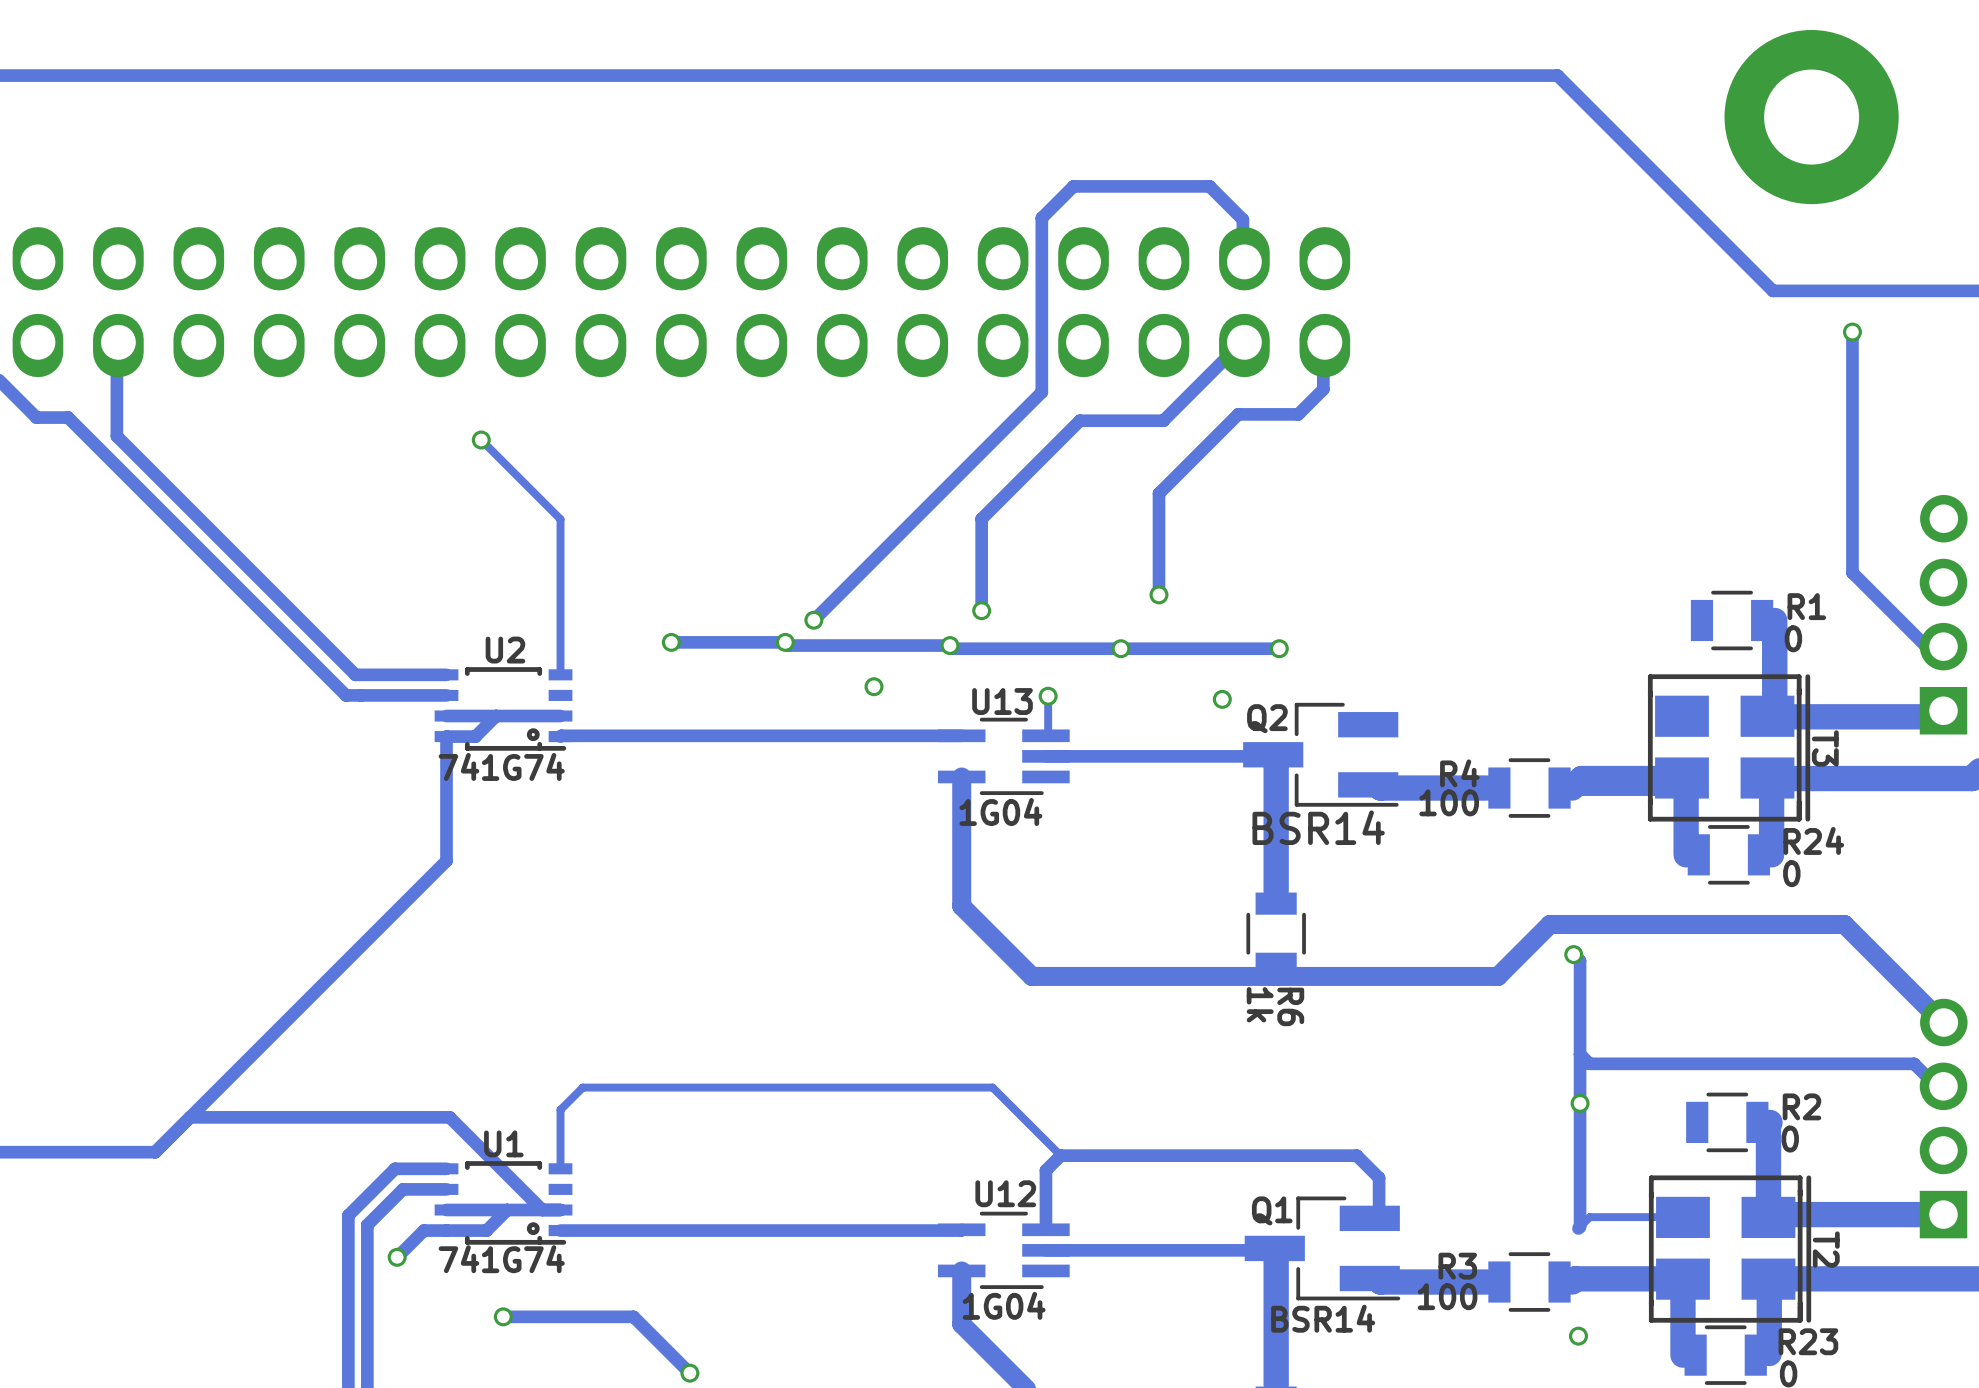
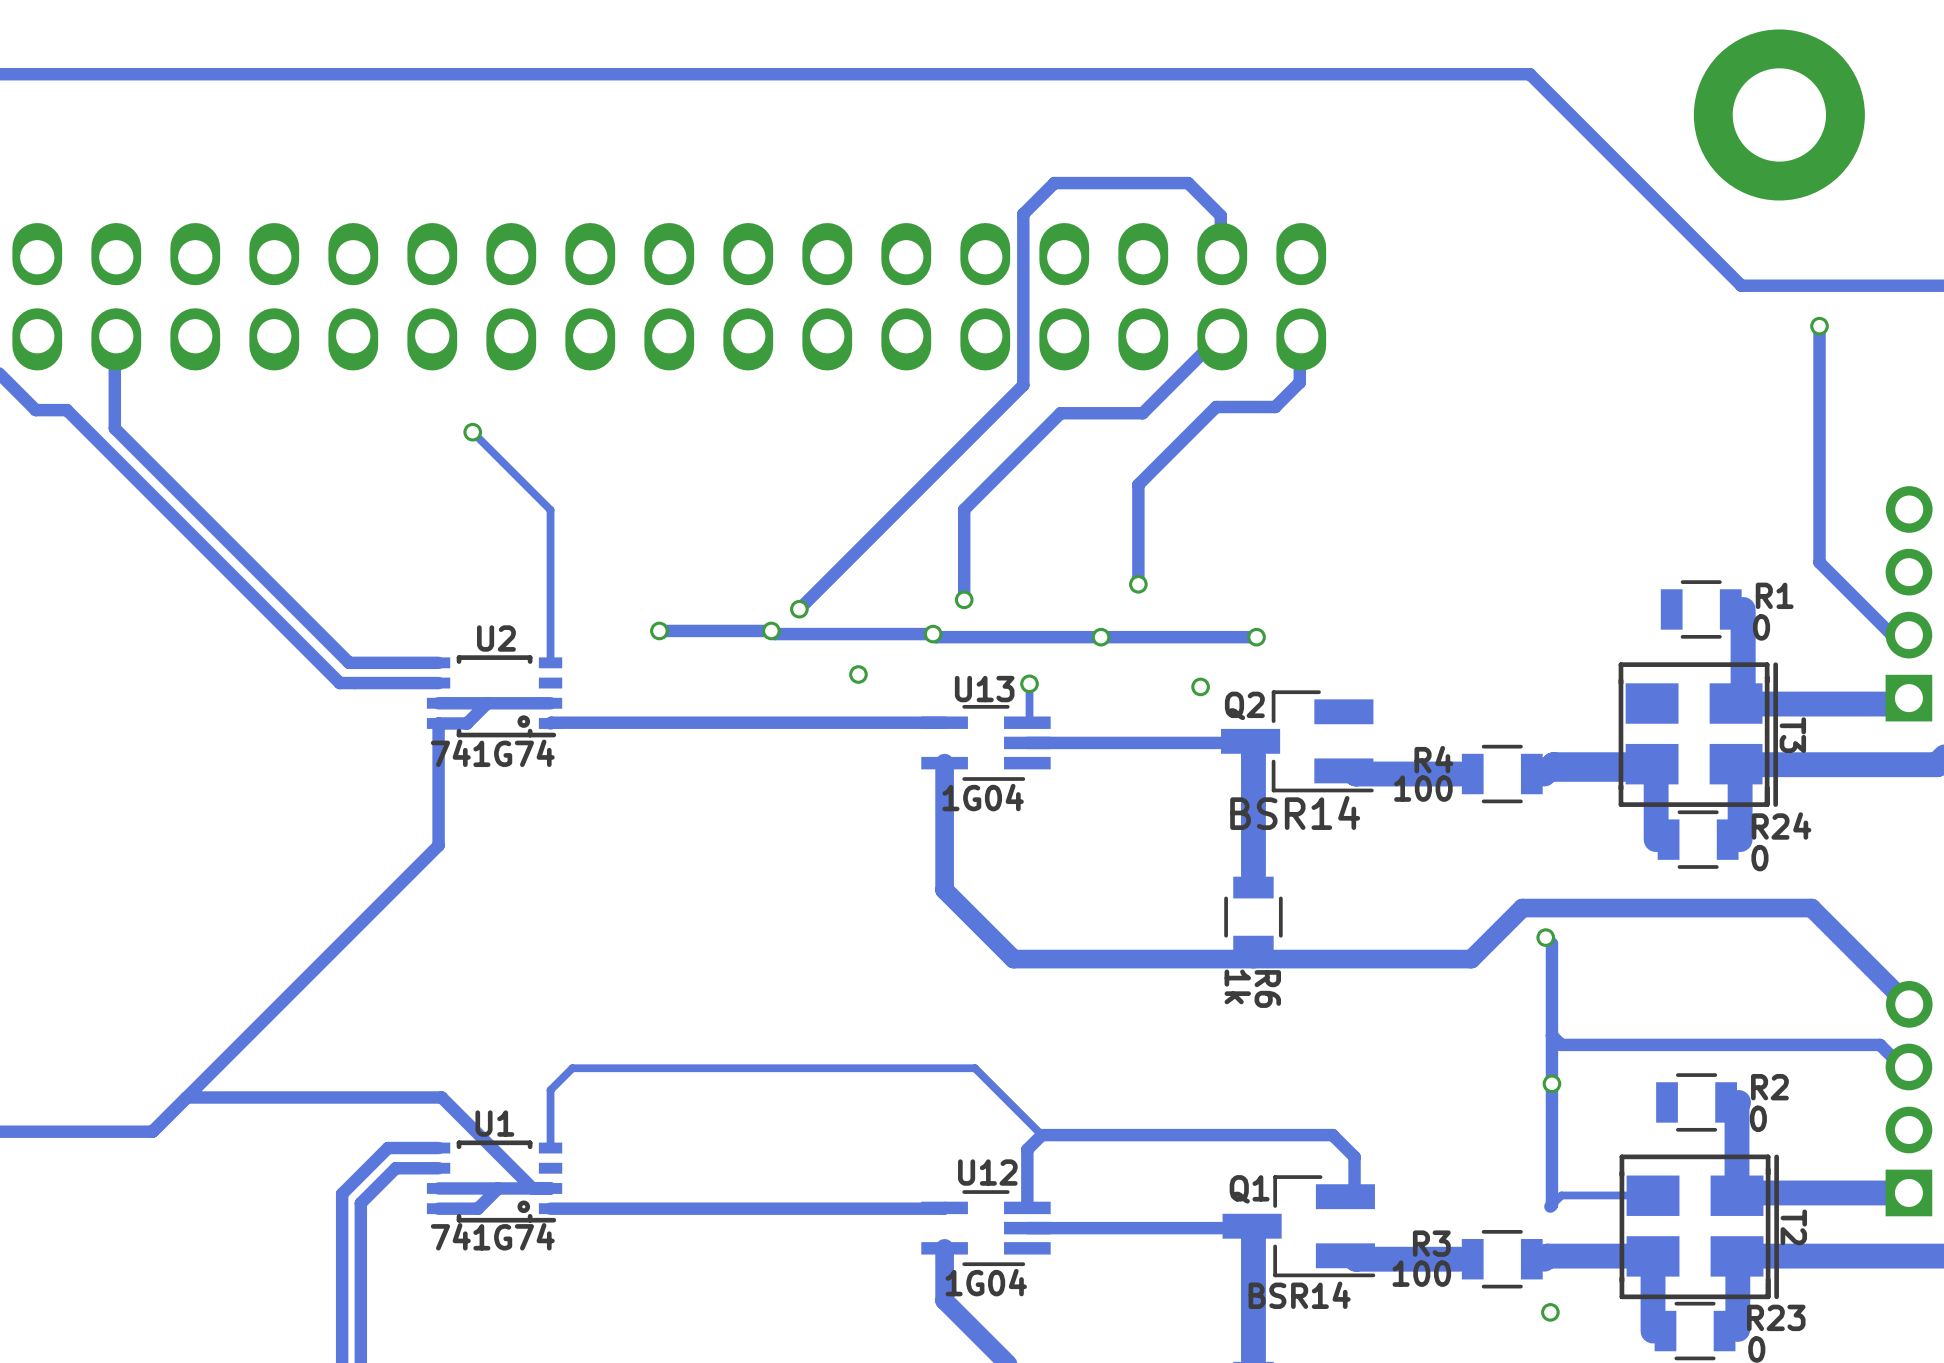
track: (446, 1230) (423, 1230) (397, 1257) -> none
via: (397, 1257) -> none
track: (503, 1316) (633, 1316) (689, 1373) -> none
via: (503, 1316) -> none
via: (689, 1373) -> none

